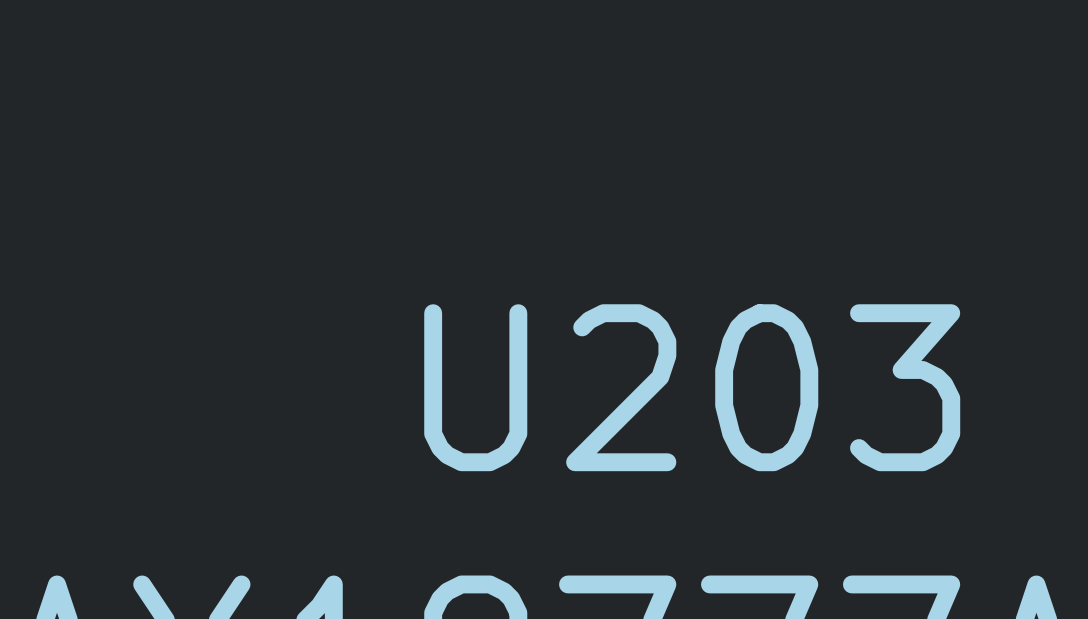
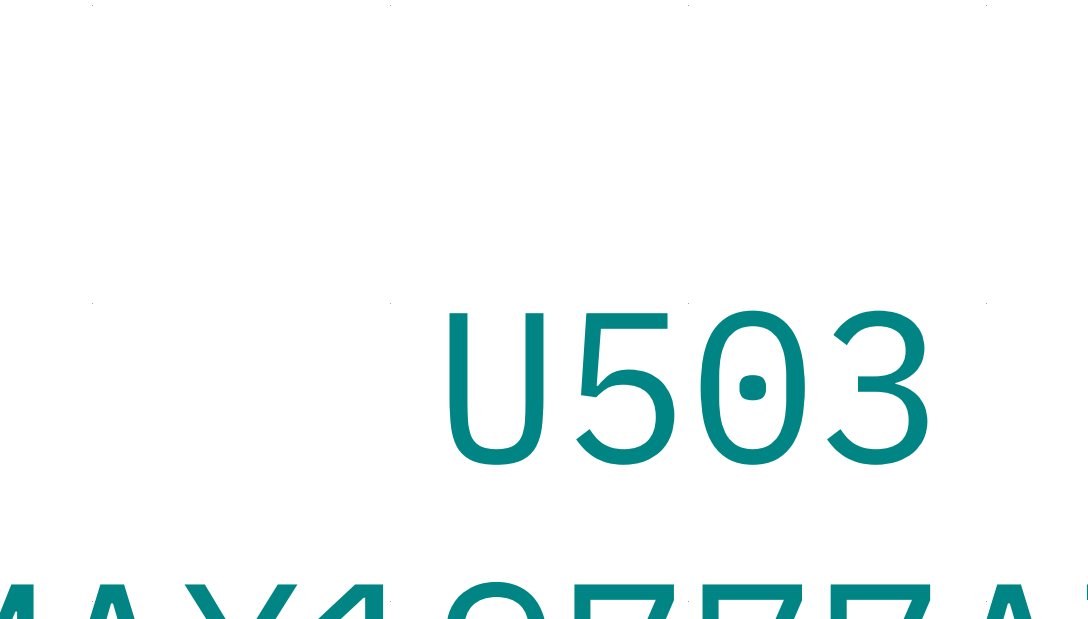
U203 name: U203 (692, 387) -> U503 (688, 387)

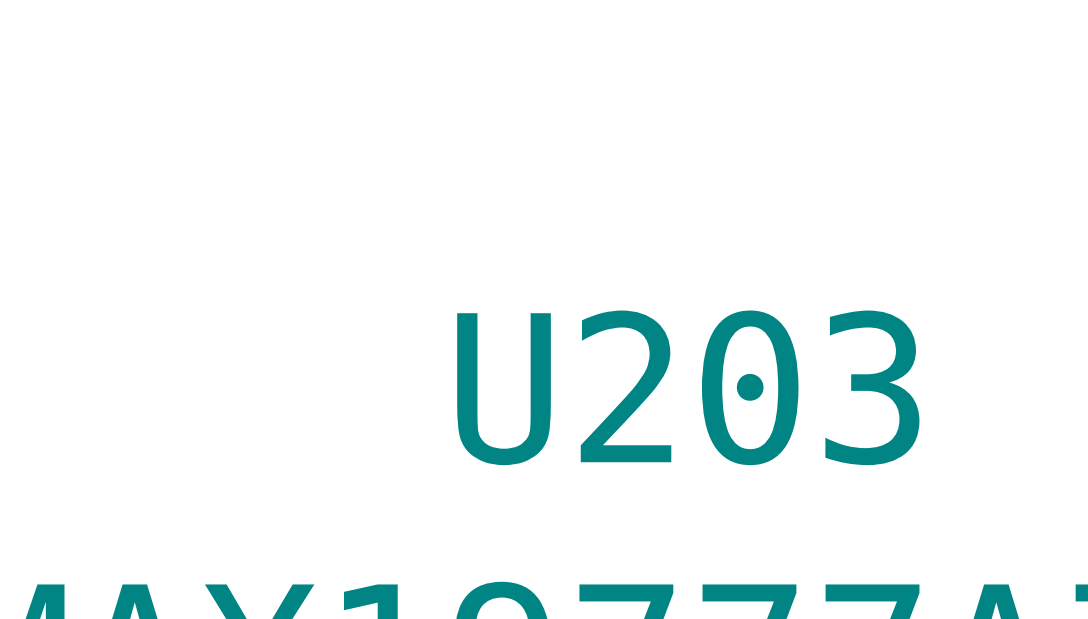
U503 name: U503 (688, 387) -> U203 (688, 387)

